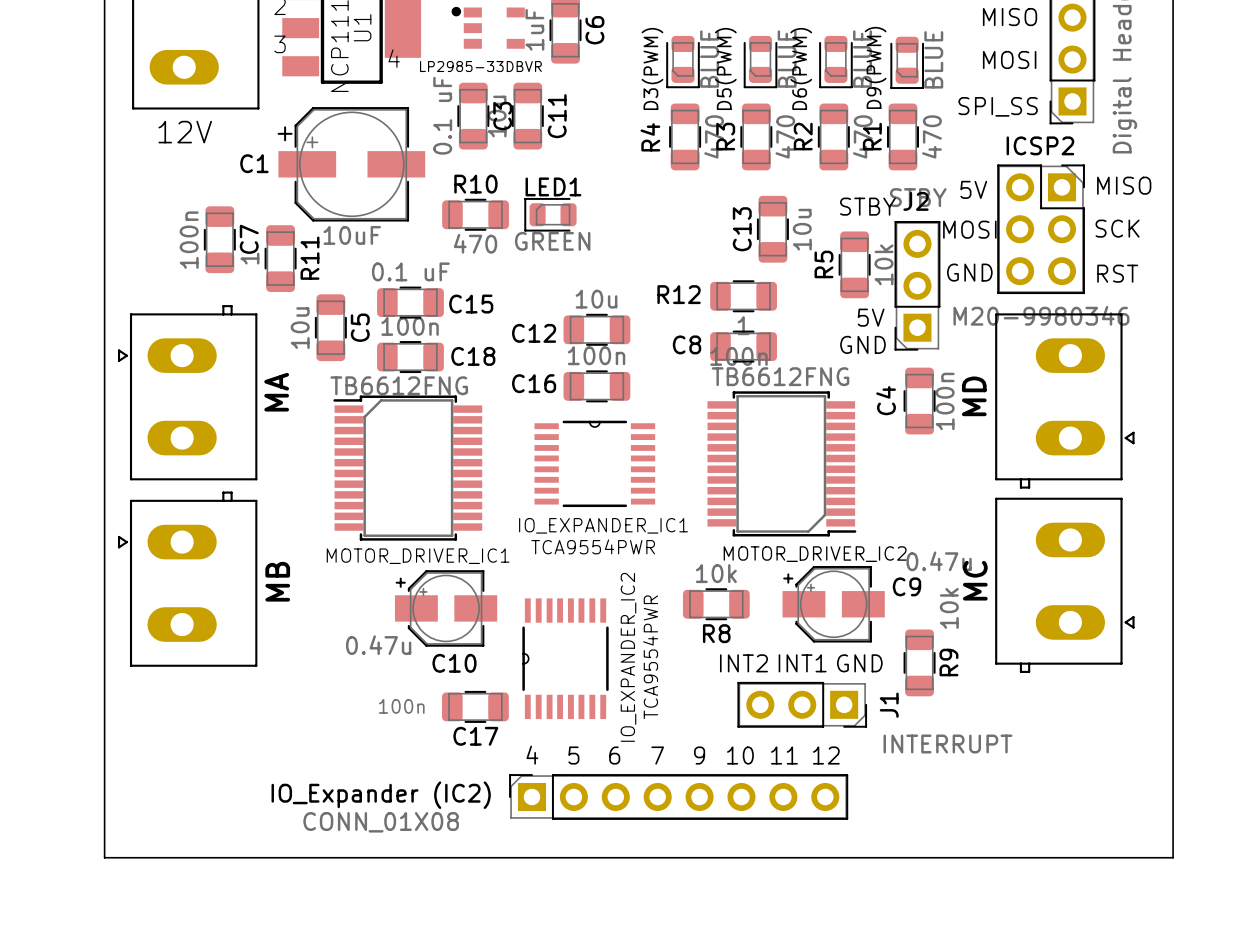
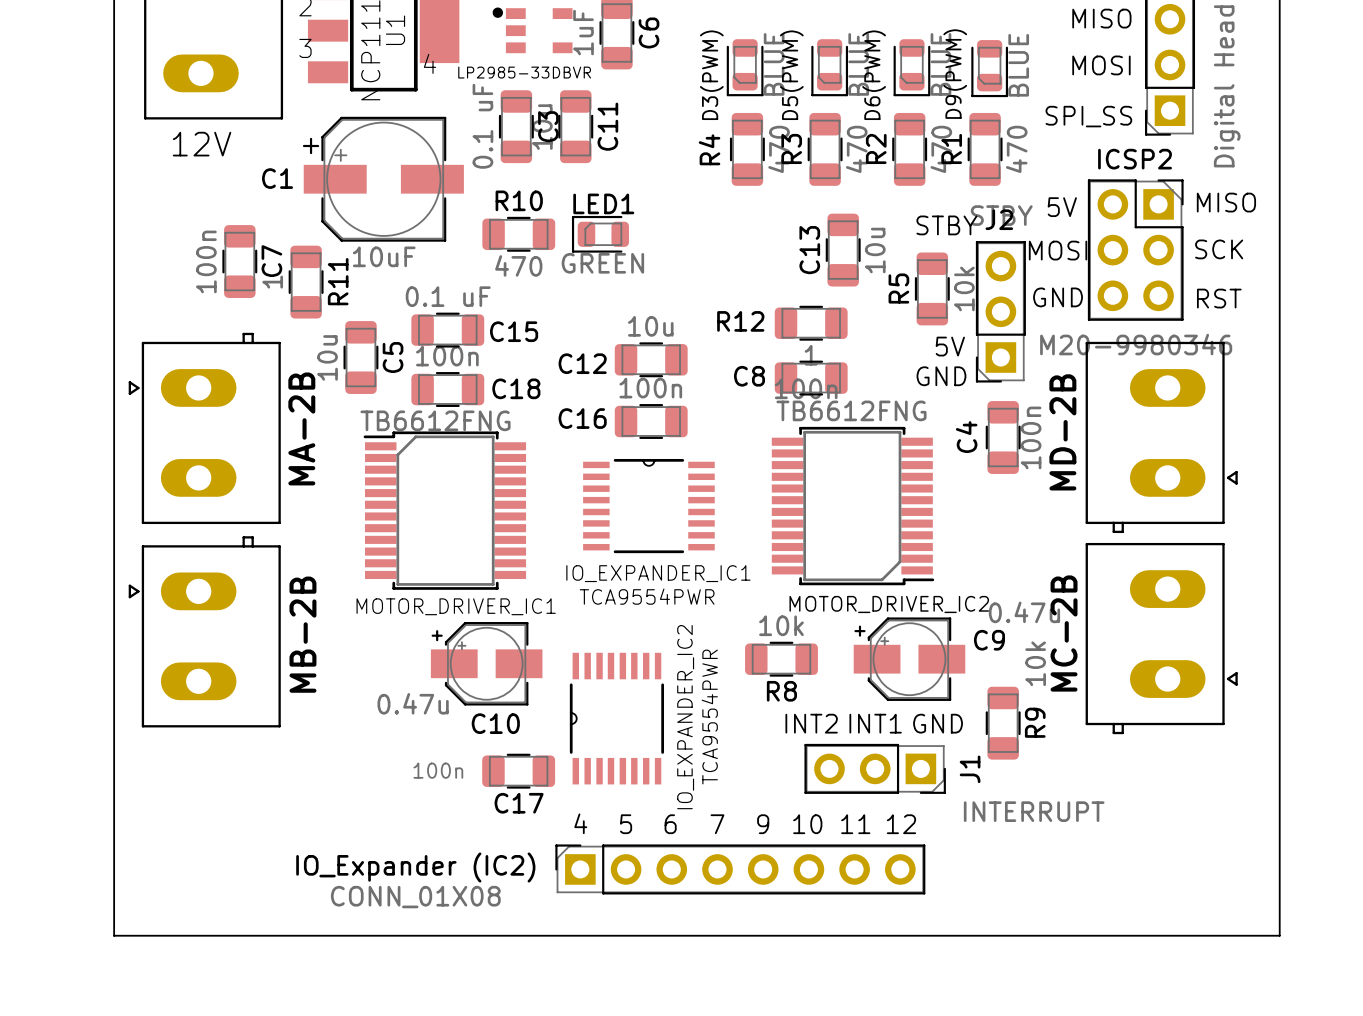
part value: MA (276, 392) -> MA-2B (301, 428)
part value: MD (974, 396) -> MD-2B (1062, 432)
part value: MC (975, 580) -> MC-2B (1064, 633)
part value: MB (277, 581) -> MB-2B (302, 634)

